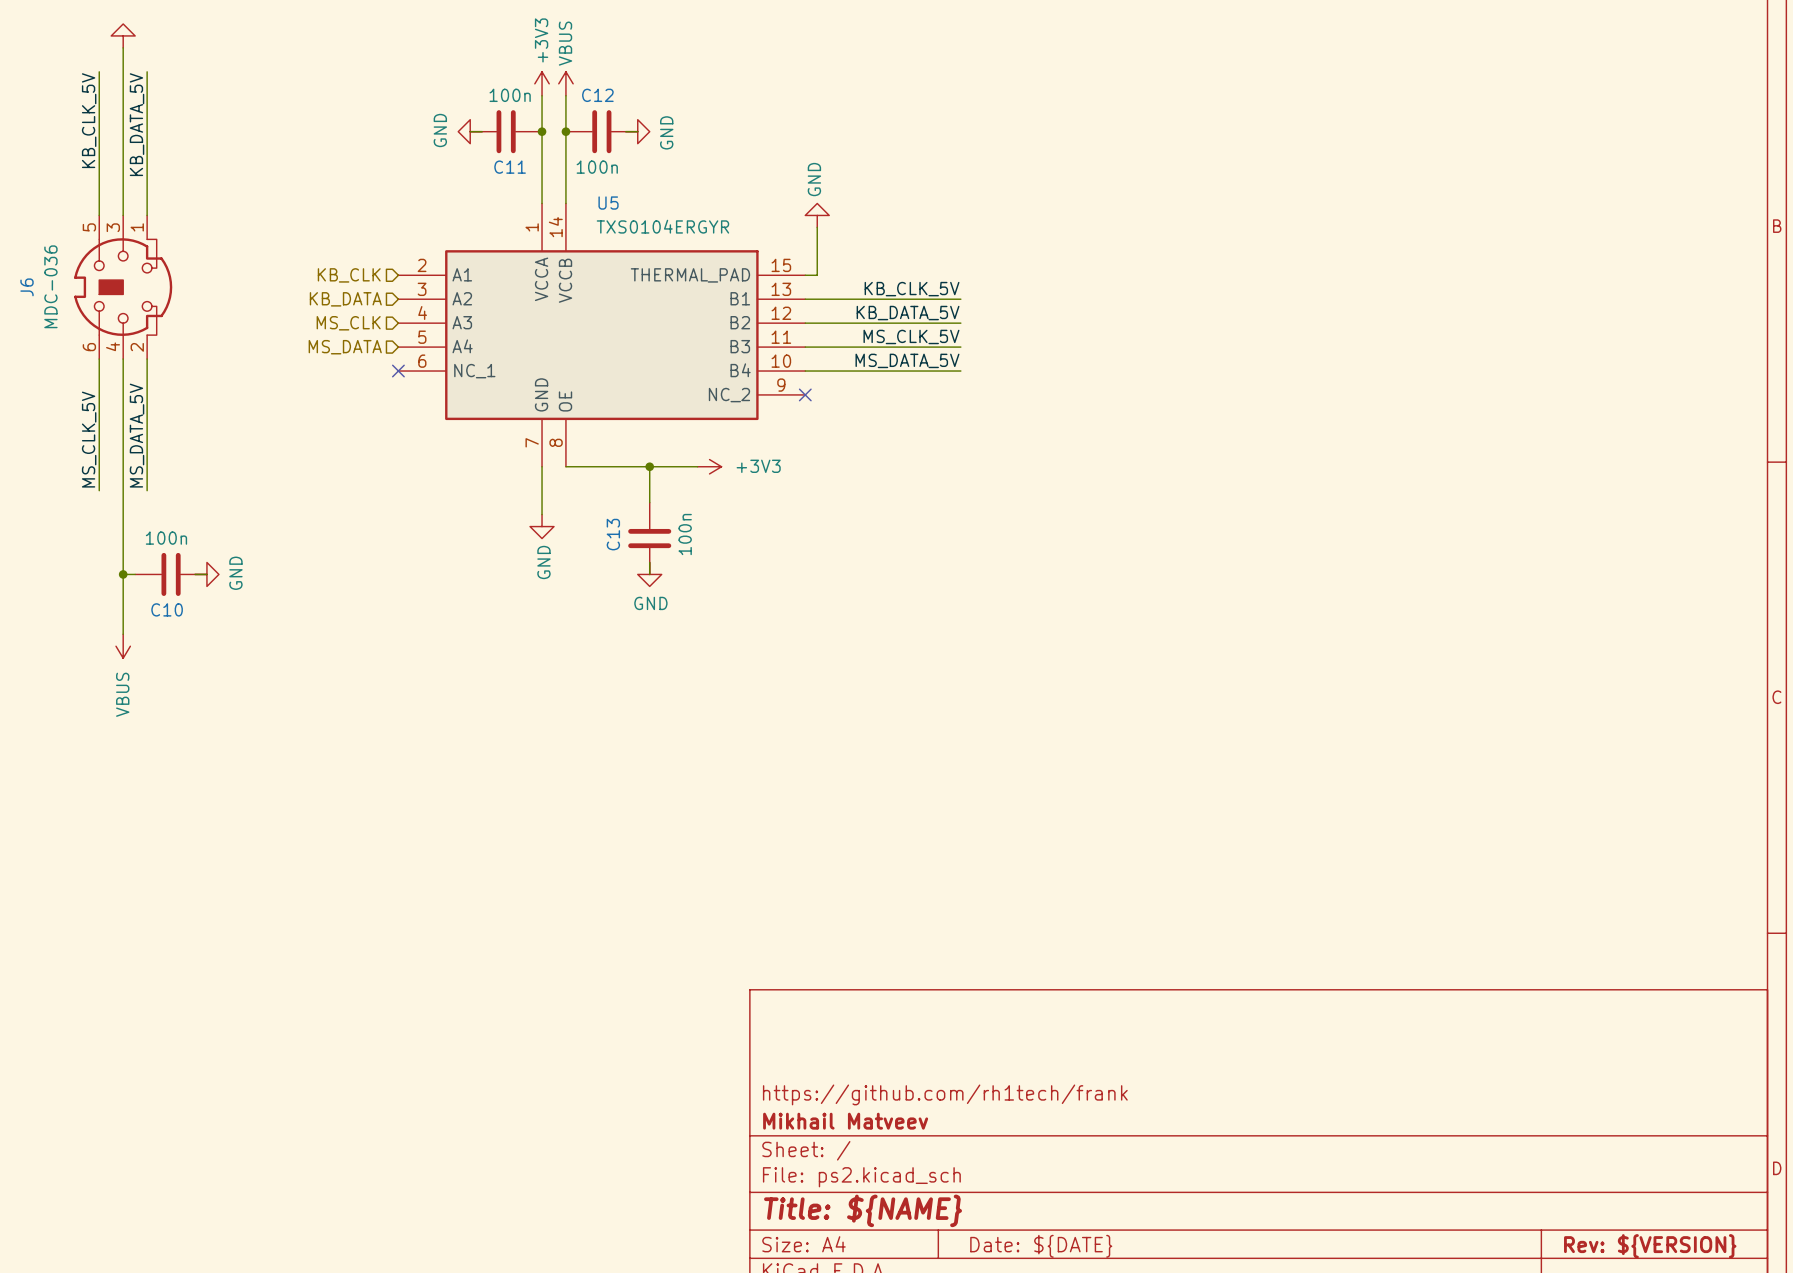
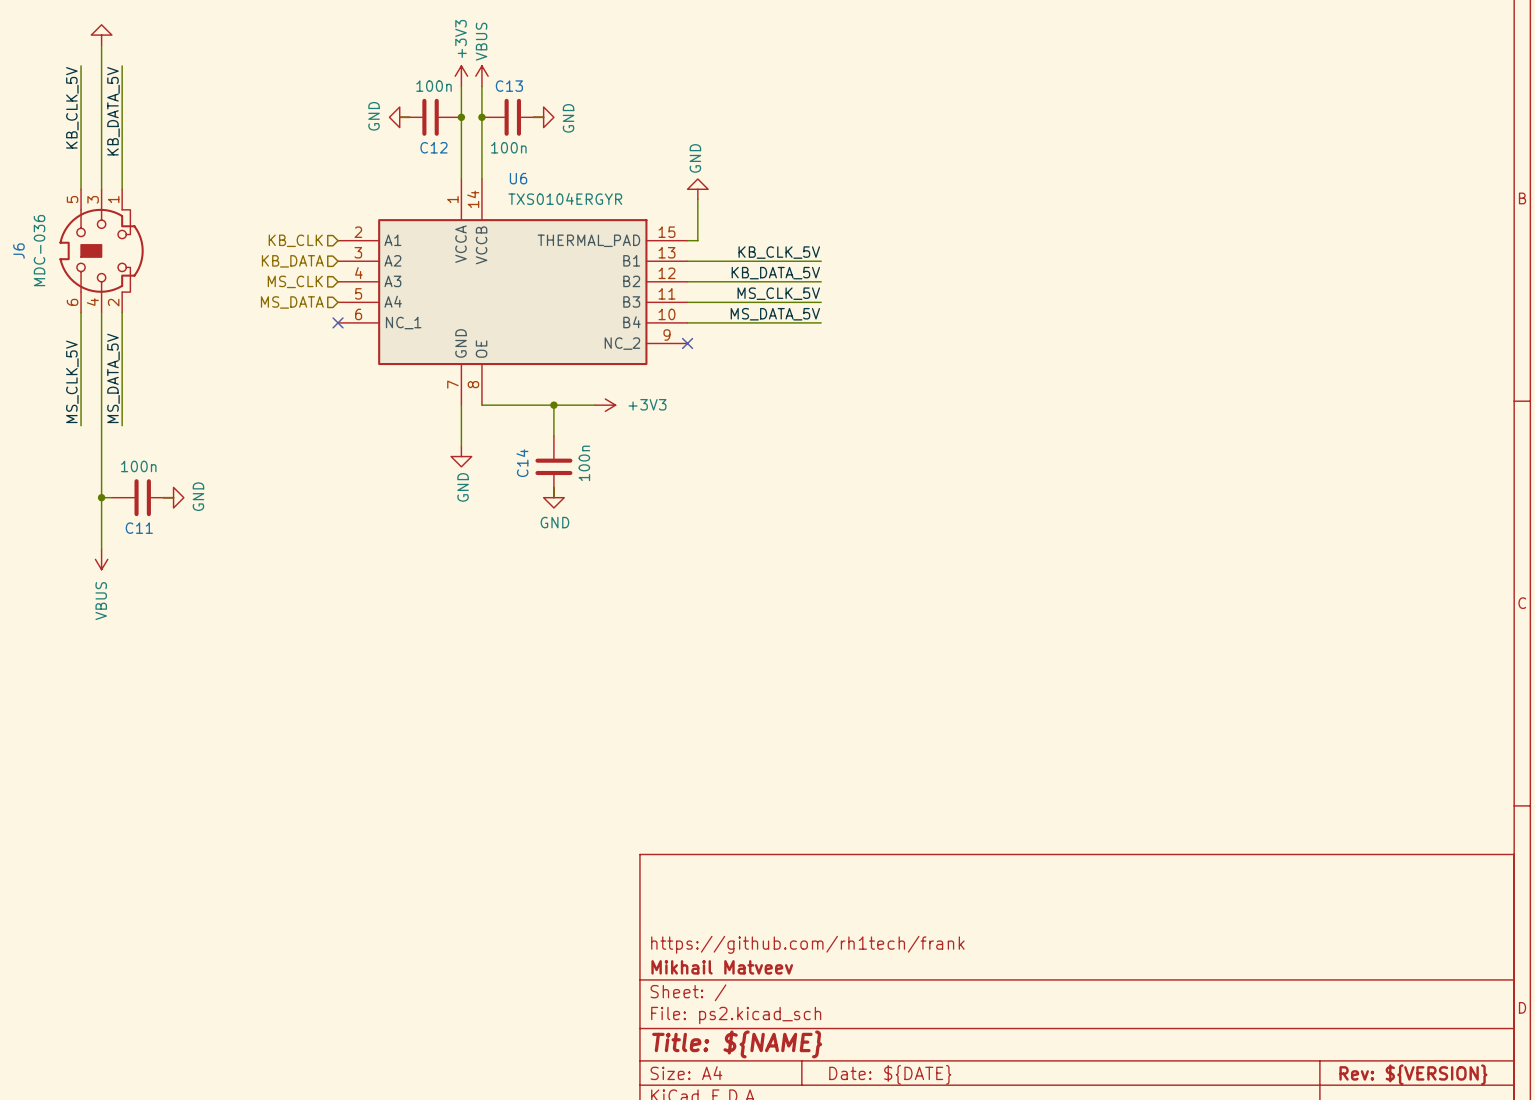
C12 name: C12 (597, 95) -> C13 (509, 86)
C11 name: C11 (510, 167) -> C12 (433, 147)
U5 name: U5 (608, 203) -> U6 (518, 178)
C13 name: C13 (613, 534) -> C14 (522, 463)
C10 name: C10 (167, 609) -> C11 (139, 528)

